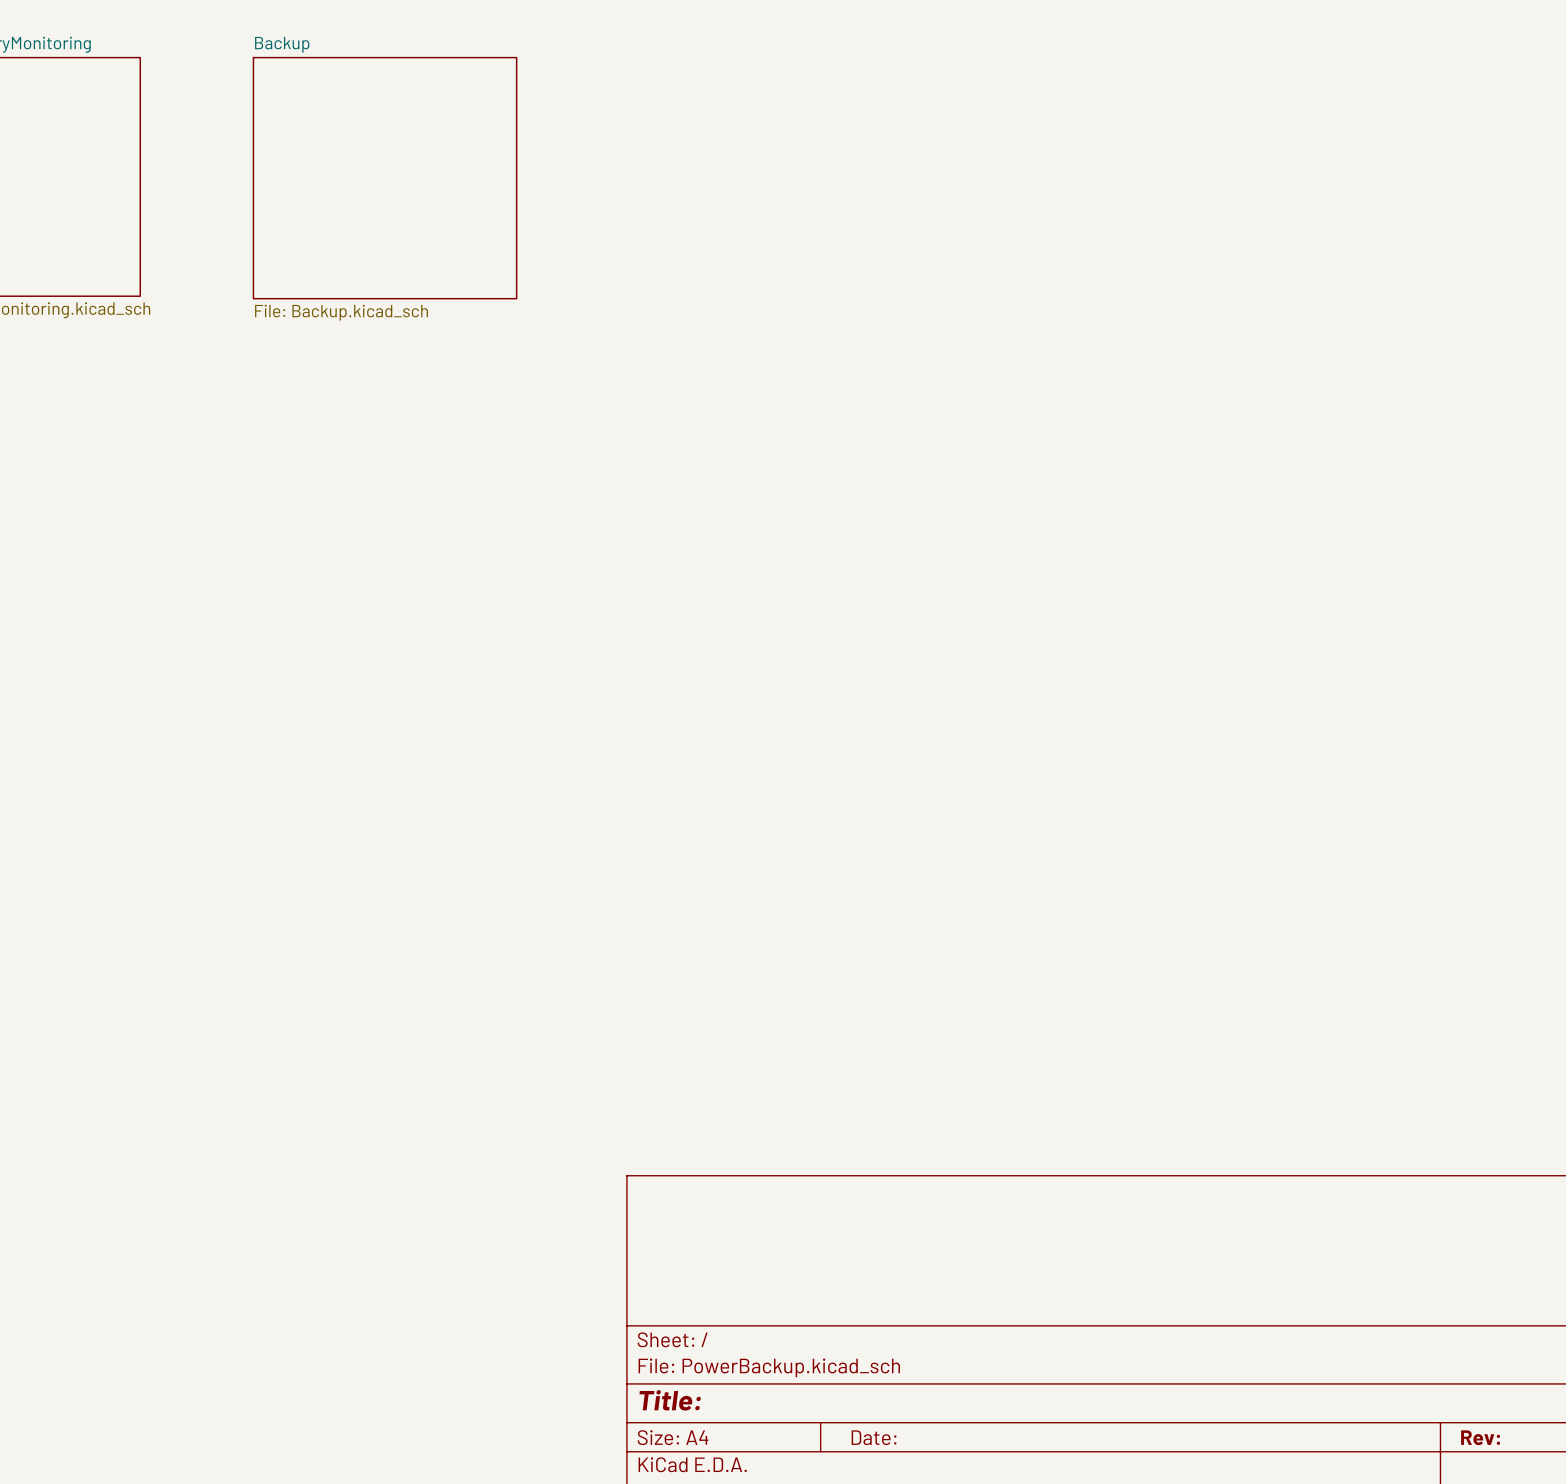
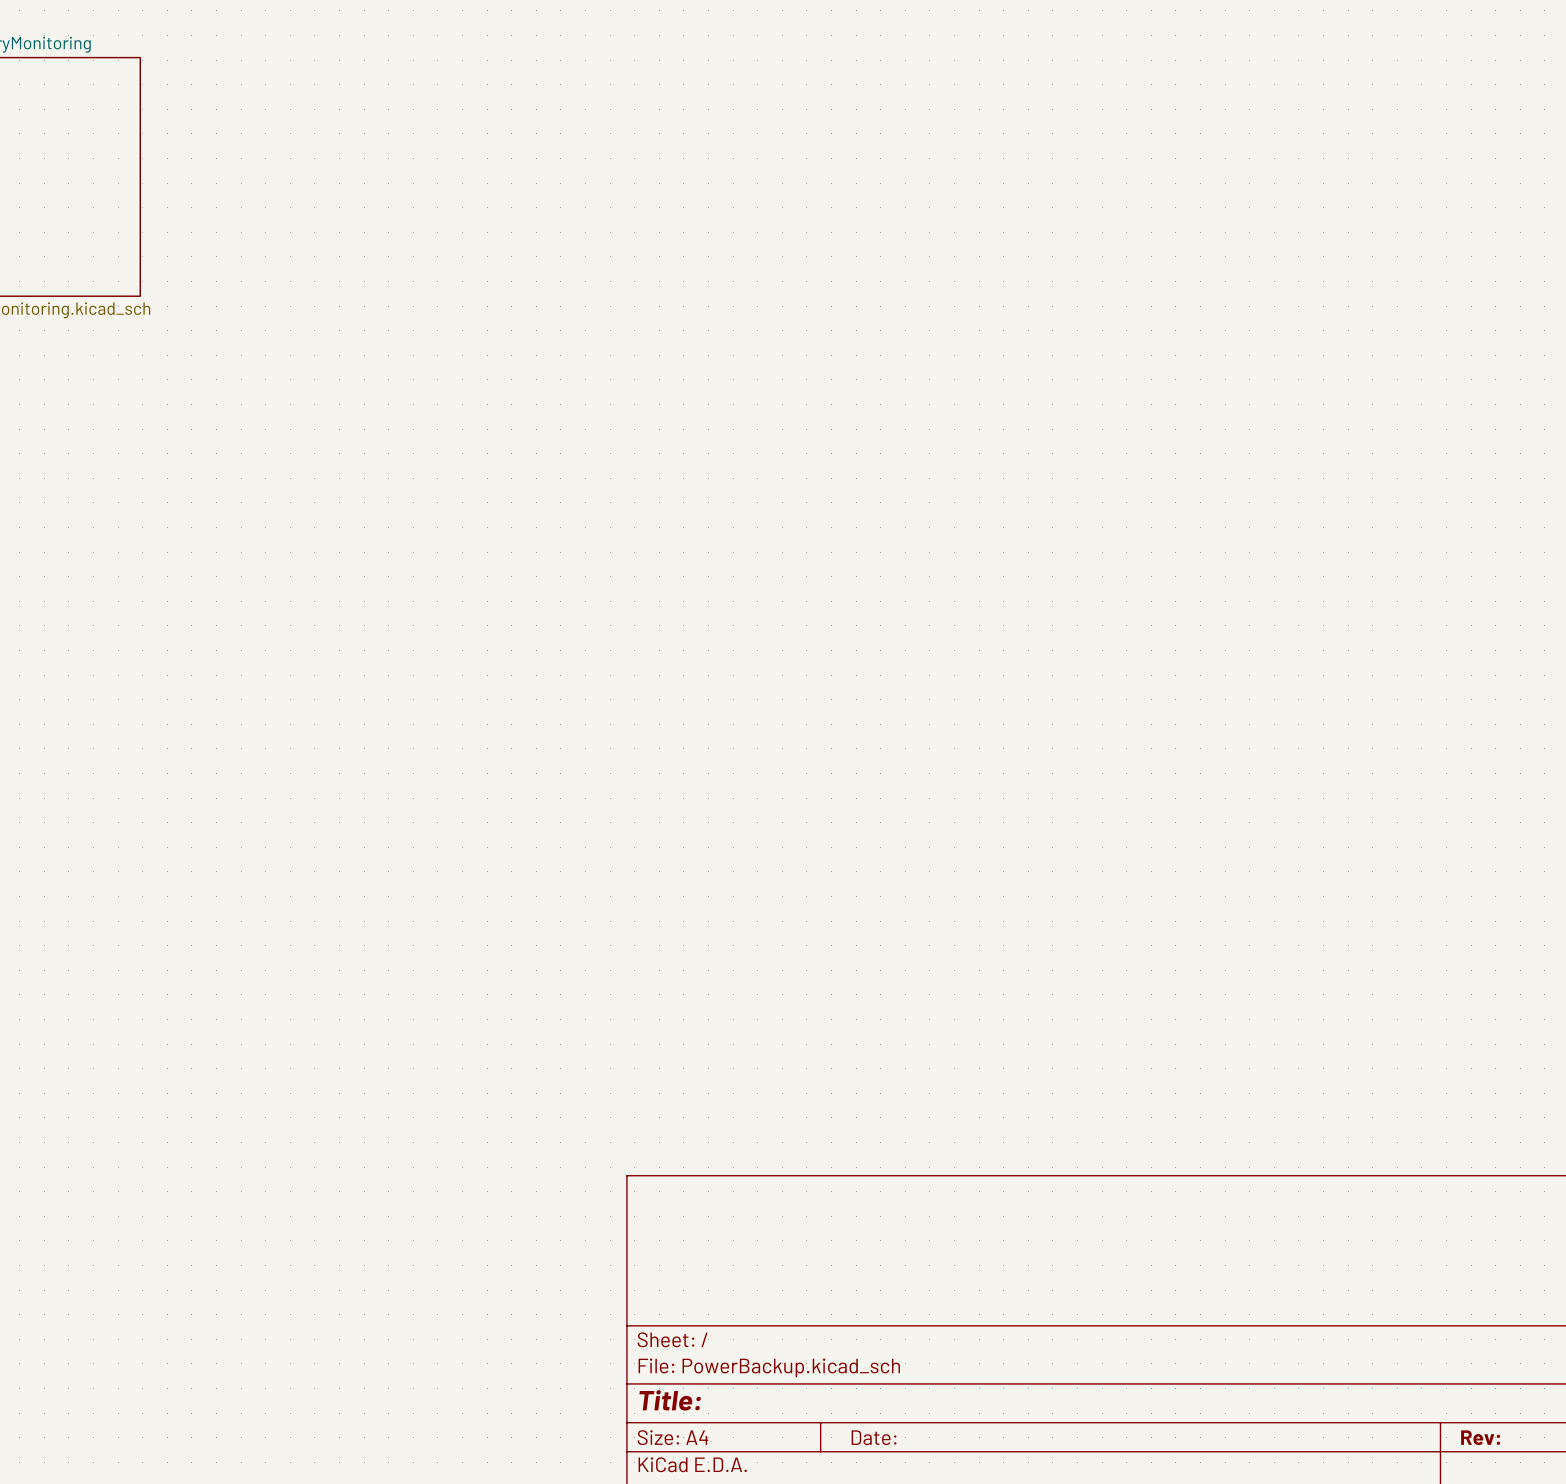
sheet Backup: File: Backup.kicad_sch (385, 178) -> none

